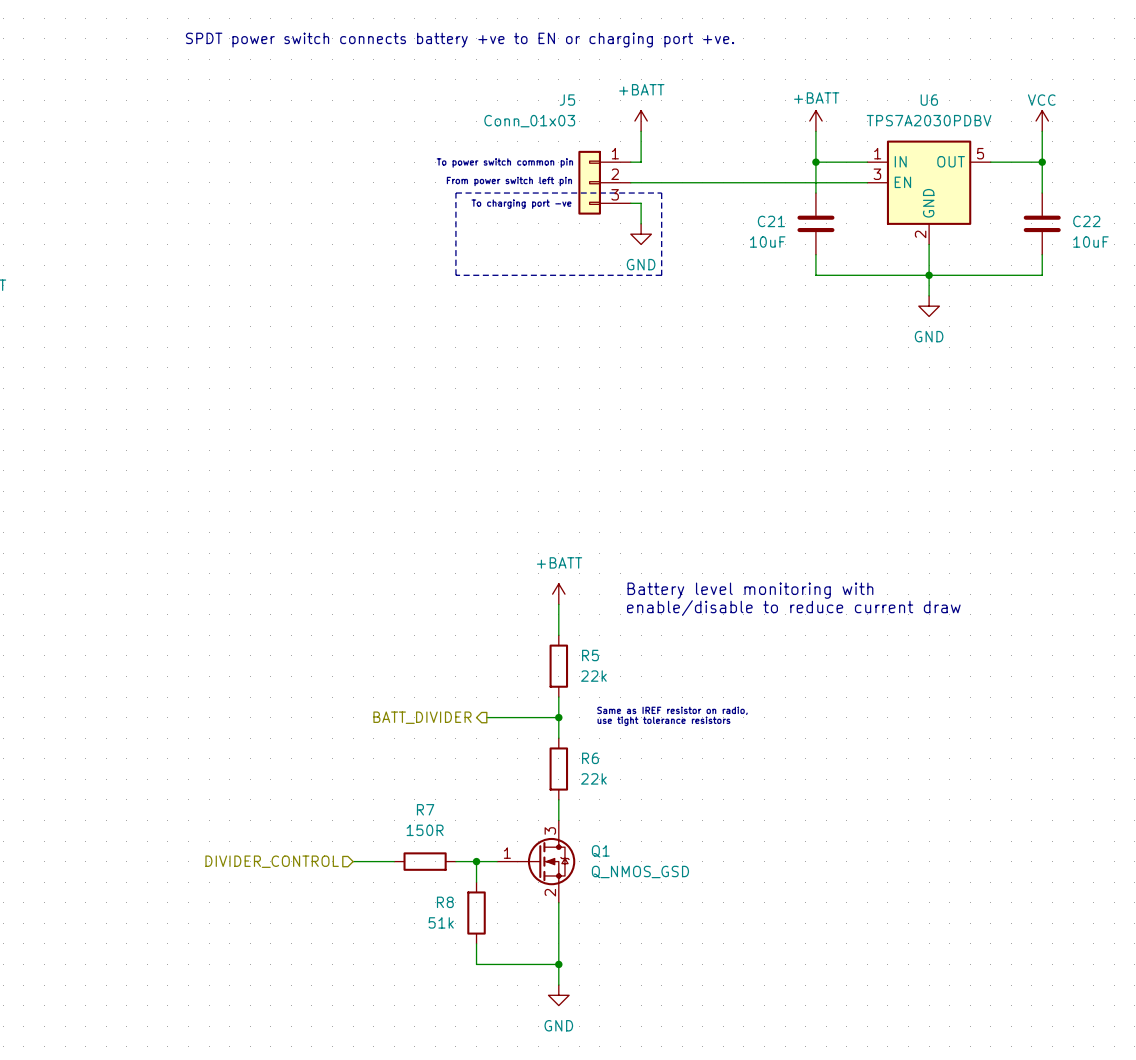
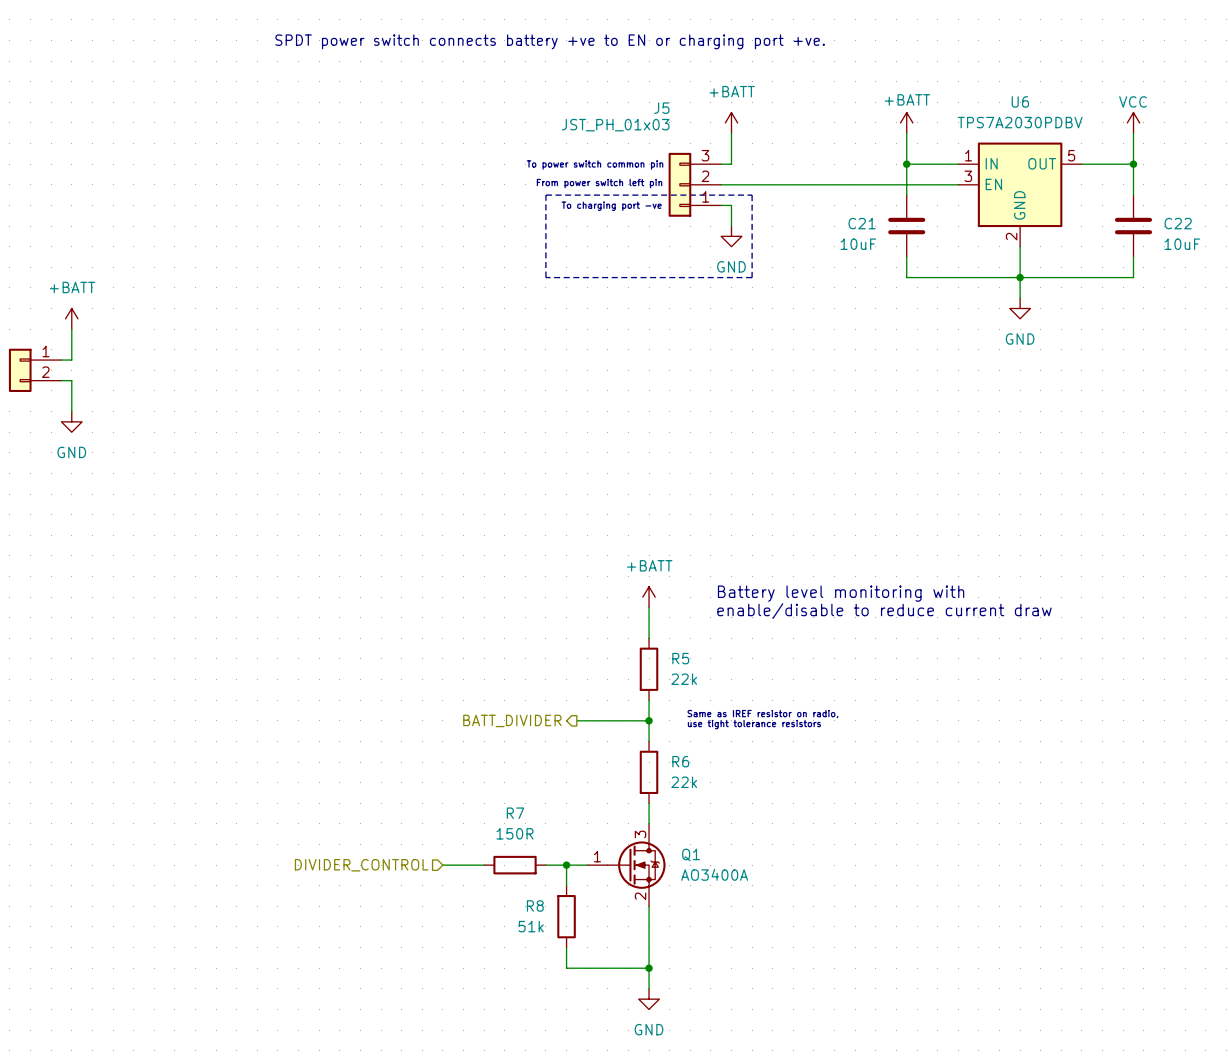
J5 value: Conn_01x03 (529, 121) -> JST_PH_01x03 (615, 125)
J5 flip: as is (589, 182) -> up-down (679, 184)
Q1 value: Q_NMOS_GSD (640, 871) -> AO3400A (714, 874)

